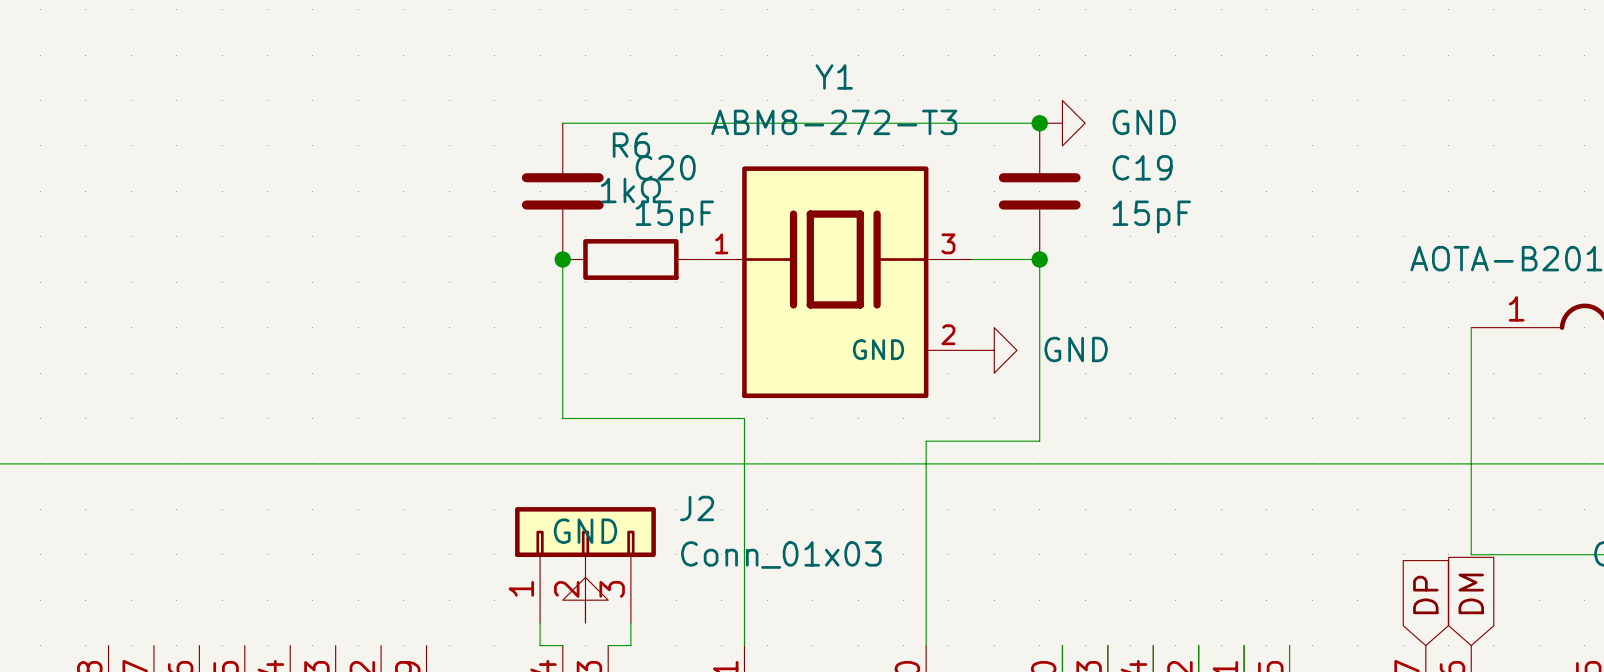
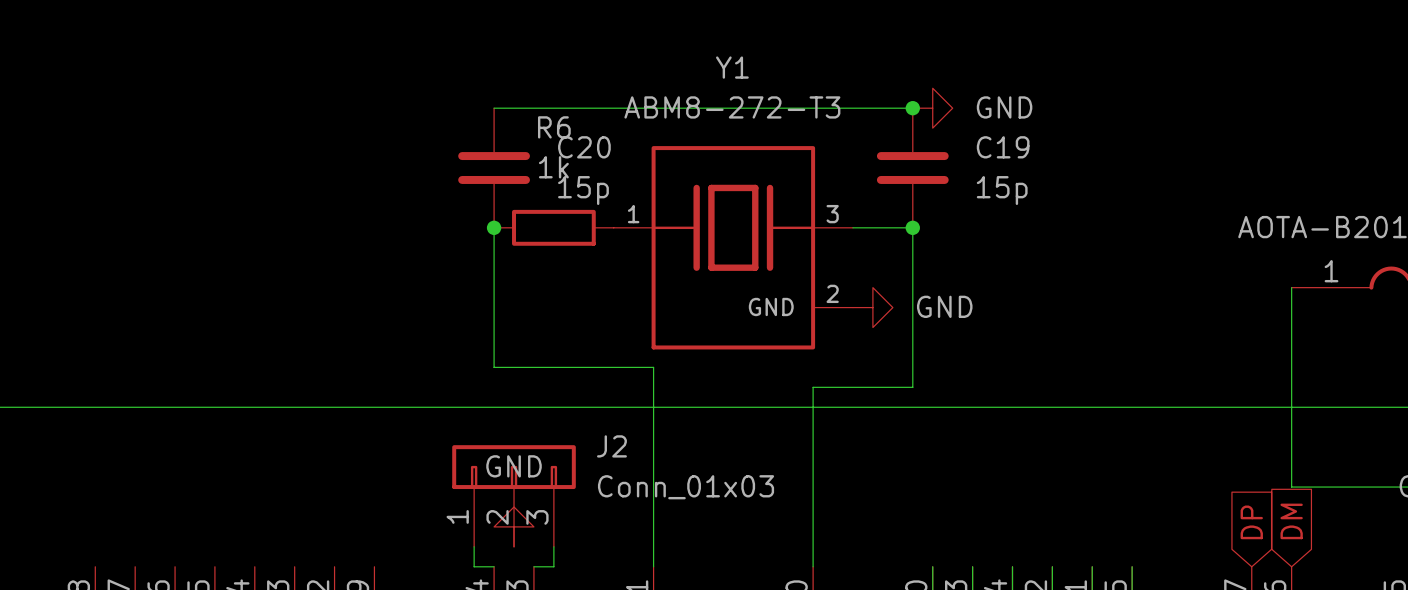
R6 value: 1kΩ (630, 190) -> 1k (553, 167)
C20 value: 15pF (674, 217) -> 15p (583, 190)
C19 value: 15pF (1151, 217) -> 15p (1002, 190)

